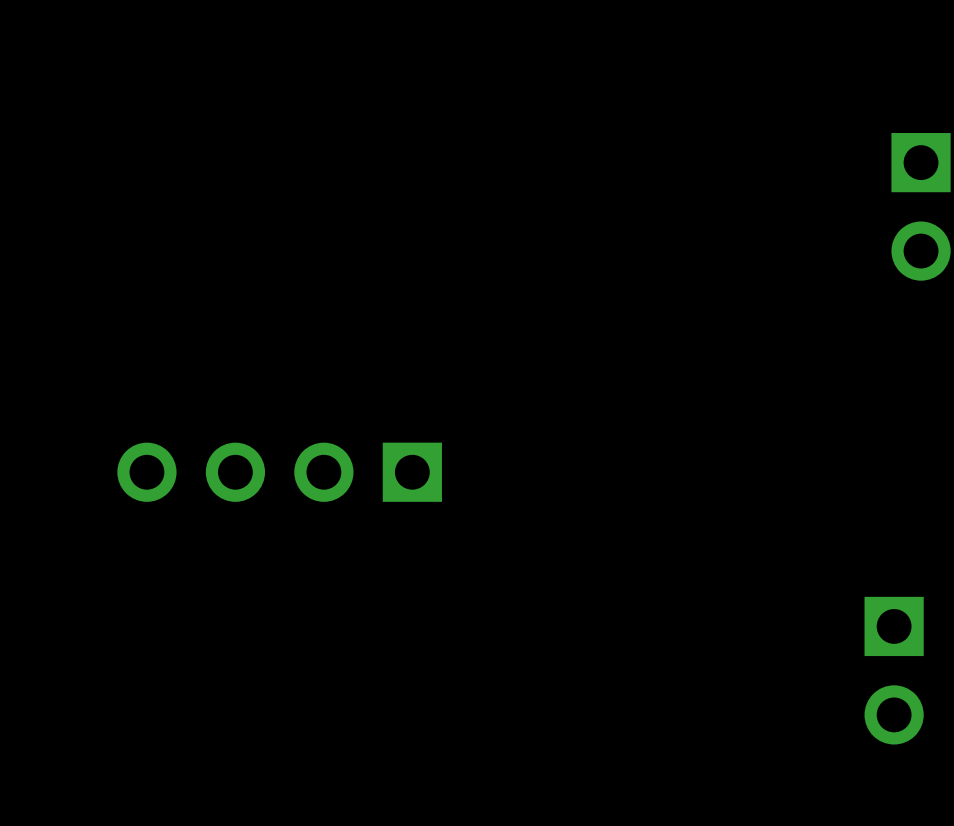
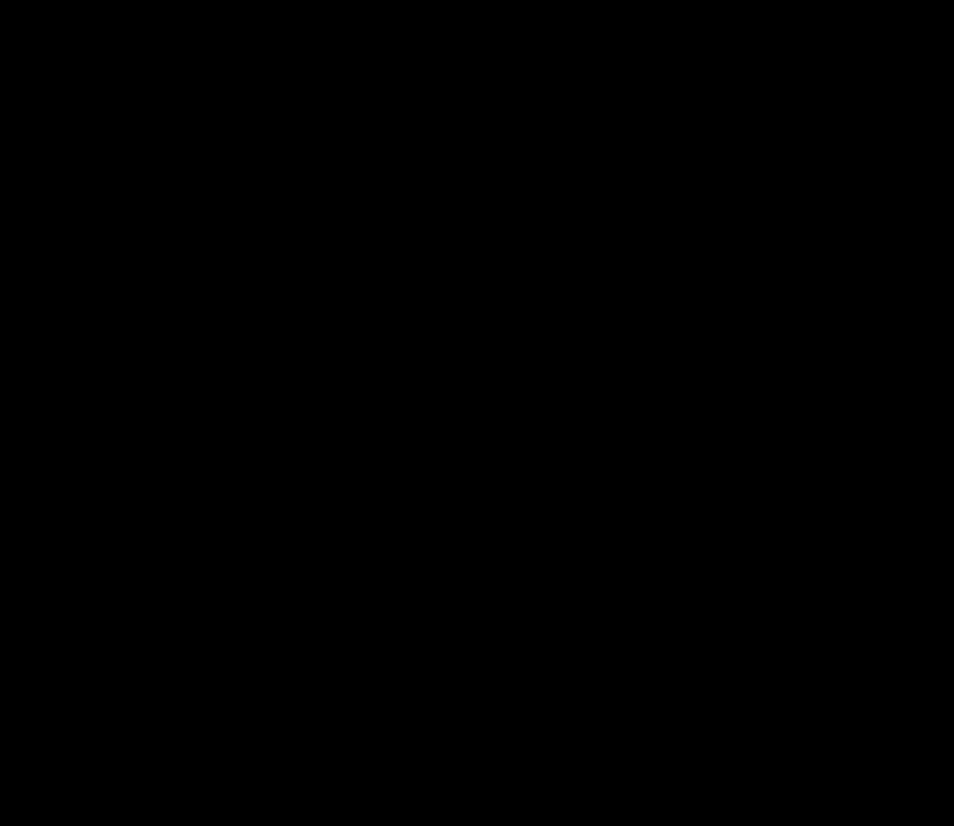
part: (921, 206) -> none
part: (279, 472) -> none
part: (894, 670) -> none

